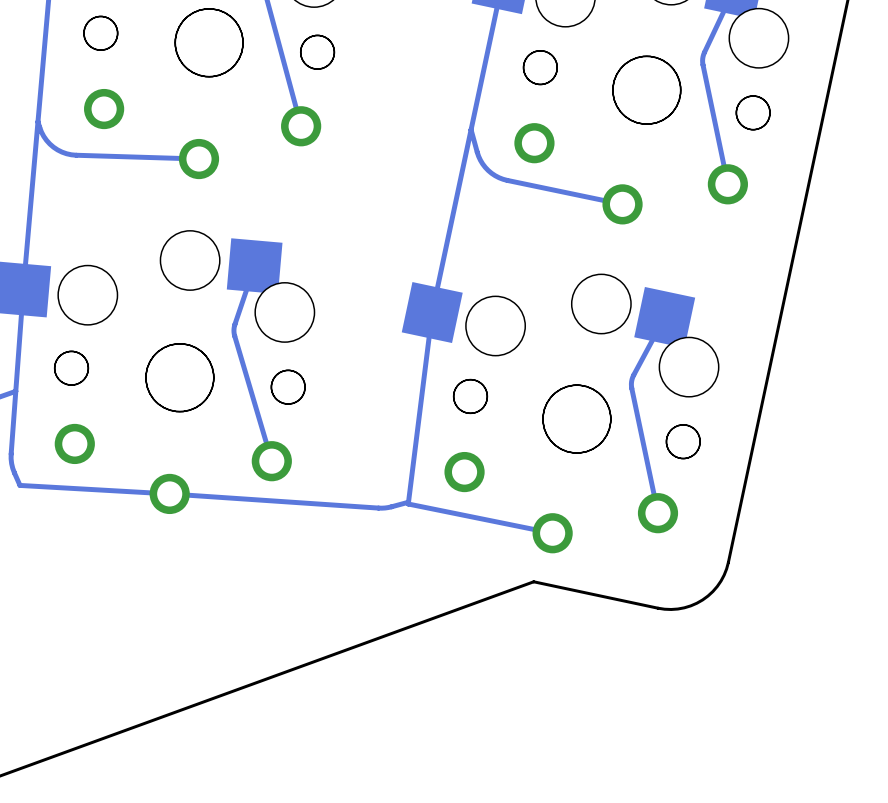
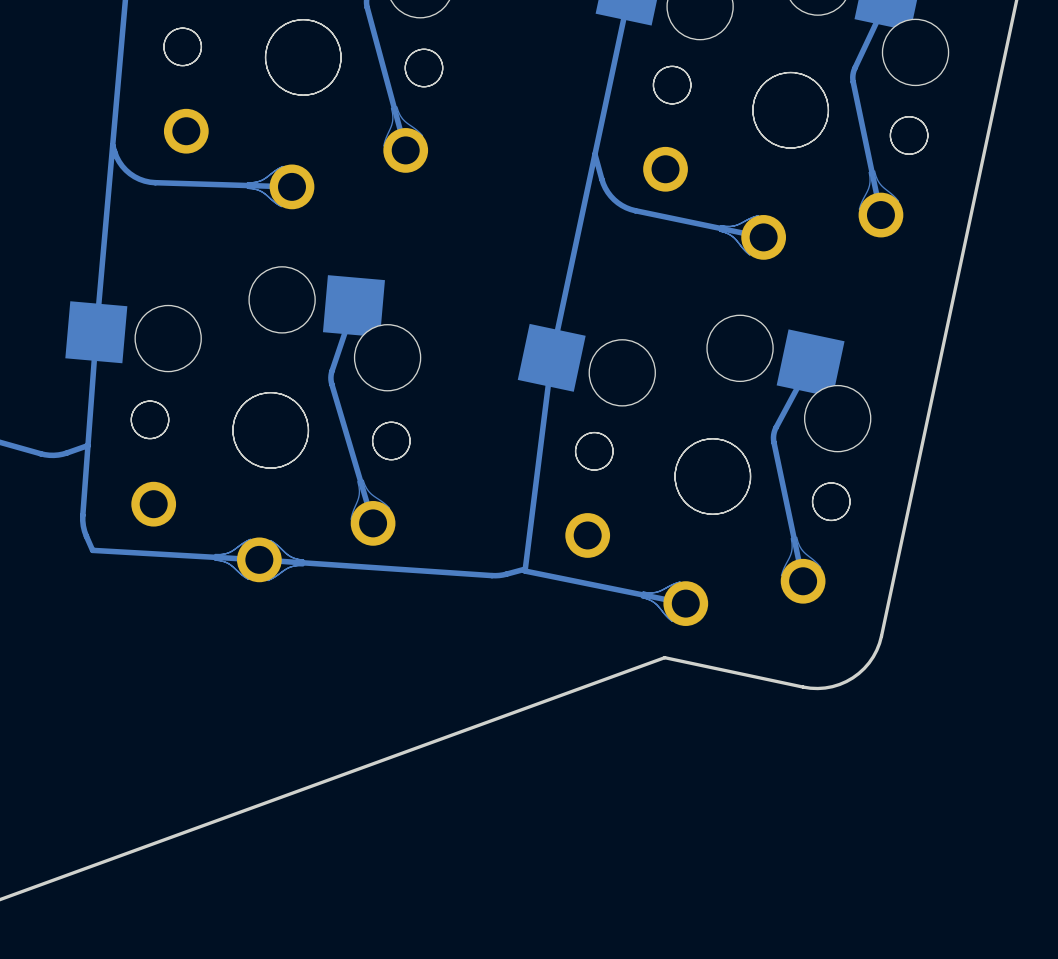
zone outline: none -> (396, 106) (402, 118) (422, 135) (408, 161) (383, 146) (392, 121) (391, 108) (396, 106)
zone outline: none -> (282, 166) (260, 180) (247, 182) (247, 188) (260, 191) (281, 206) (303, 187) (282, 166)
zone outline: none -> (874, 170) (879, 183) (898, 201) (883, 226) (859, 209) (869, 185) (869, 171) (874, 170)
zone outline: none -> (758, 215) (733, 226) (720, 225) (719, 231) (731, 235) (749, 255) (774, 239) (758, 215)
zone outline: none -> (363, 479) (369, 491) (389, 508) (376, 534) (351, 519) (359, 494) (357, 481) (363, 479)
zone outline: none -> (796, 537) (801, 549) (820, 567) (805, 592) (781, 575) (791, 551) (791, 538) (796, 537)
zone outline: none -> (250, 539) (228, 552) (214, 554) (214, 560) (227, 563) (248, 579) (270, 560) (250, 539)
zone outline: none -> (270, 540) (248, 559) (267, 580) (290, 567) (303, 565) (304, 560) (291, 556) (270, 540)
zone outline: none -> (680, 581) (655, 592) (642, 592) (641, 597) (653, 602) (672, 621) (696, 605) (680, 581)

